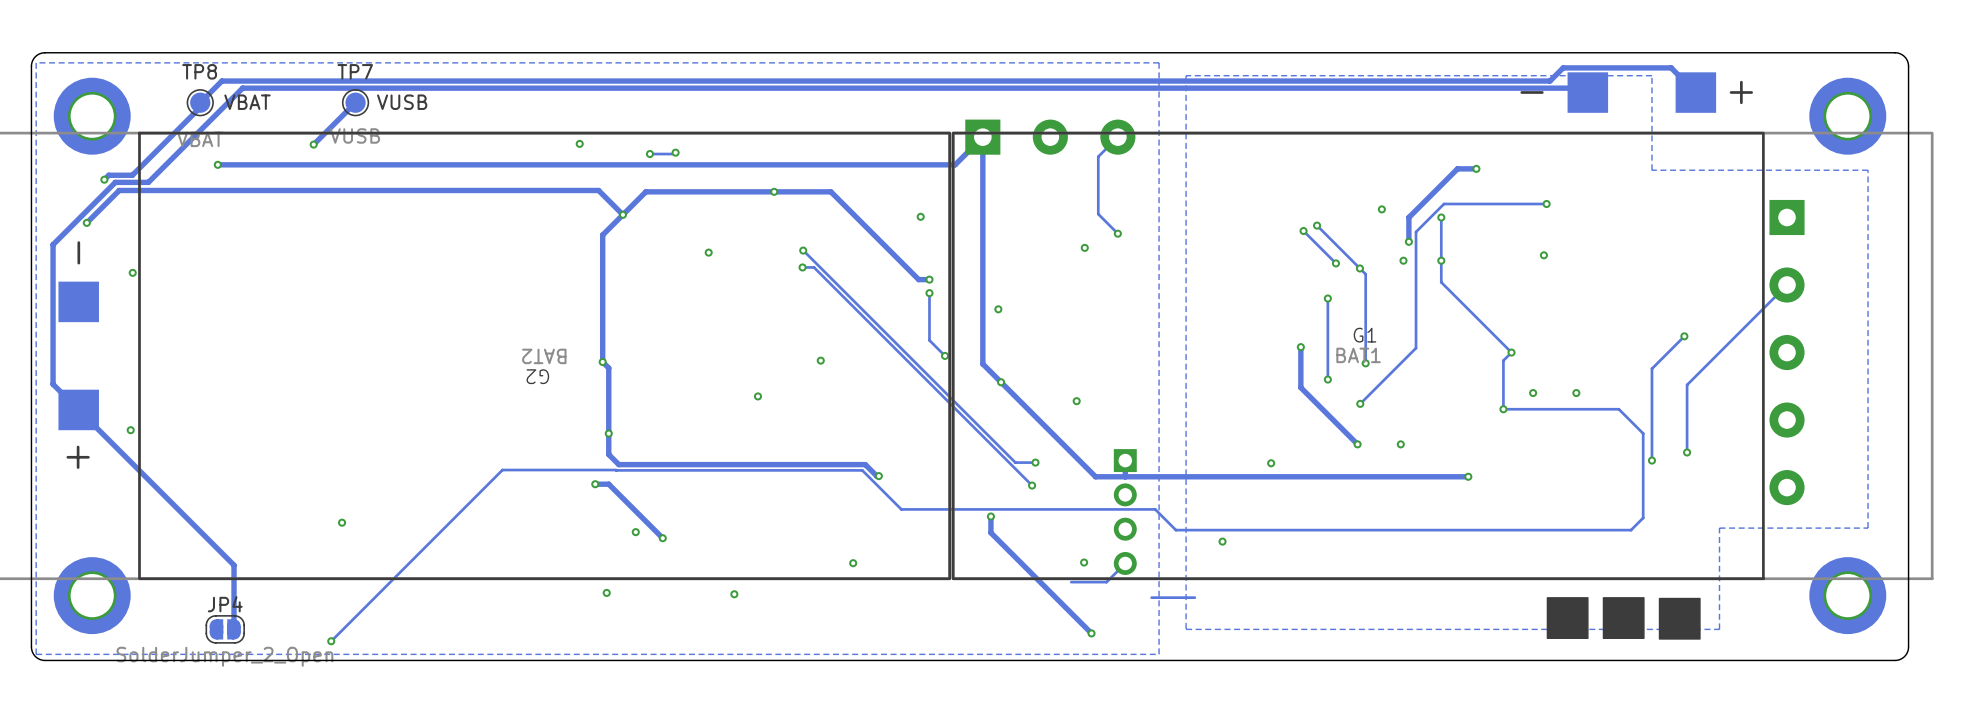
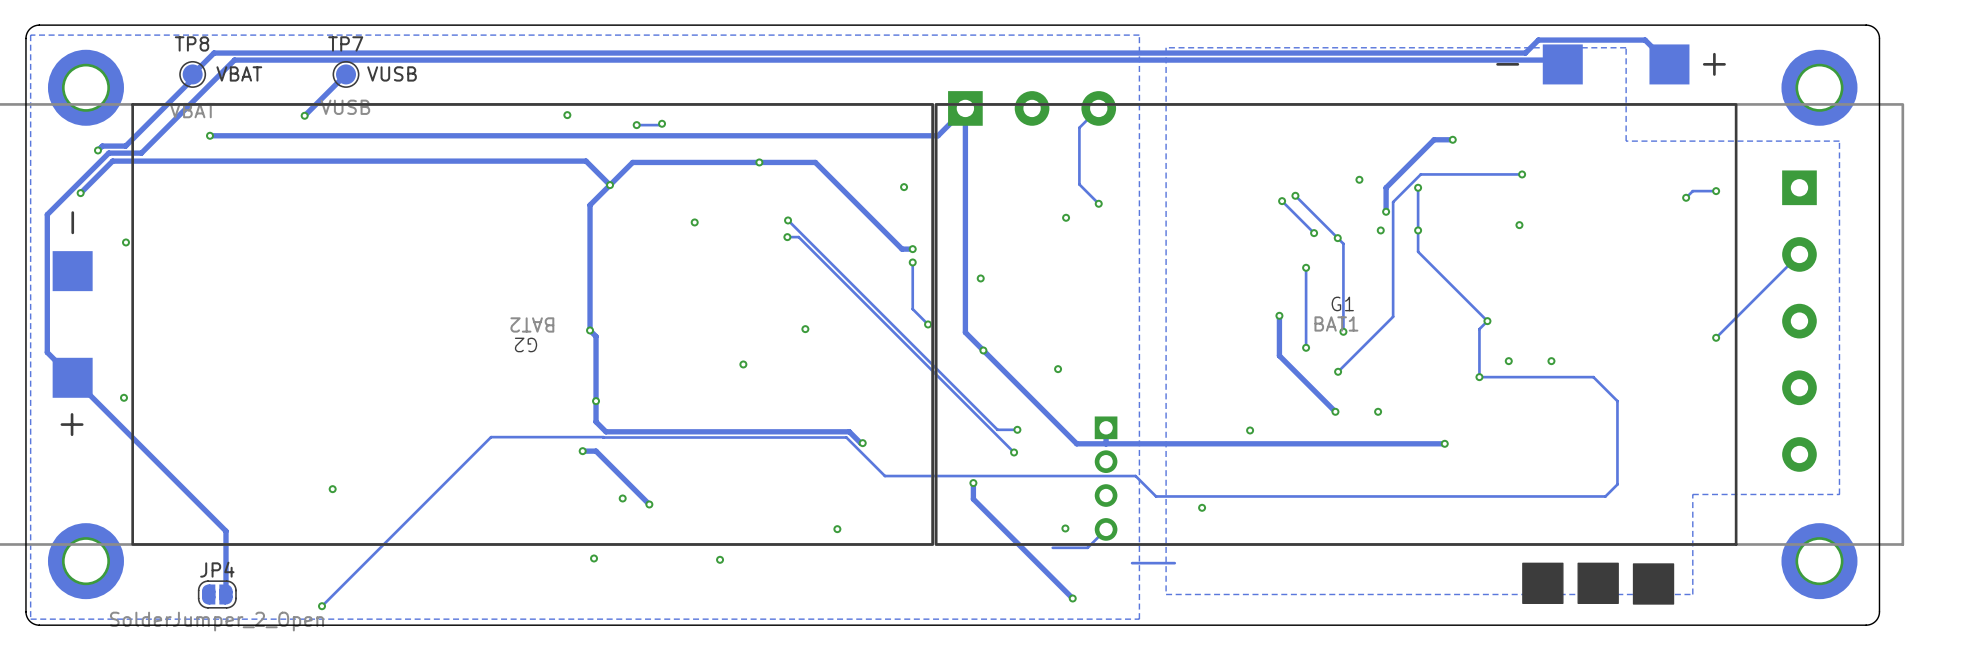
track: none -> (1716, 191) (1692, 191) (1686, 197)
via: none -> (1716, 191)
via: none -> (1686, 197)
track: (1787, 285) (1687, 384) (1687, 452) -> none
track: none -> (1799, 254) (1716, 337)
track: (1684, 336) (1651, 368) (1651, 460) -> none
via: (1684, 336) -> none
part position: (1787, 352) -> (1799, 321)
via: none -> (1716, 337)
via: (1687, 452) -> none
via: (1651, 460) -> none

